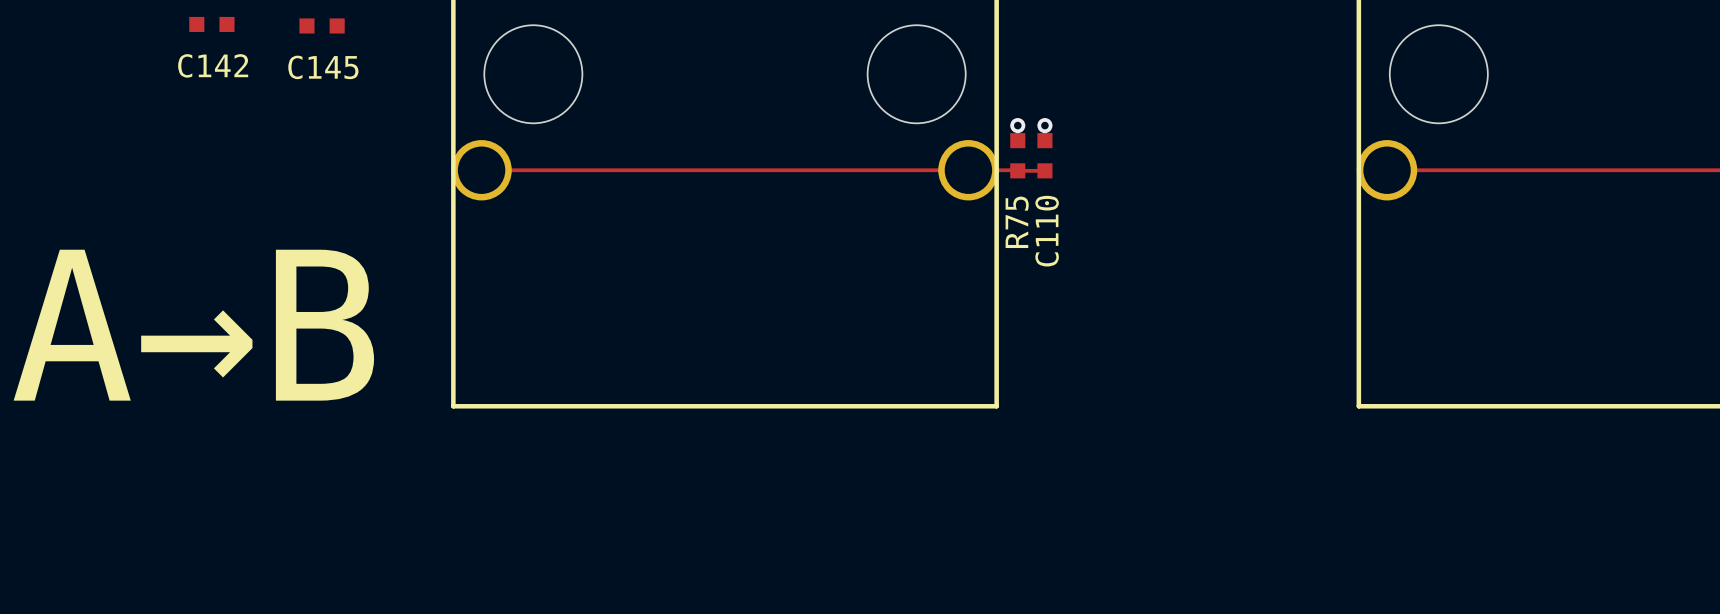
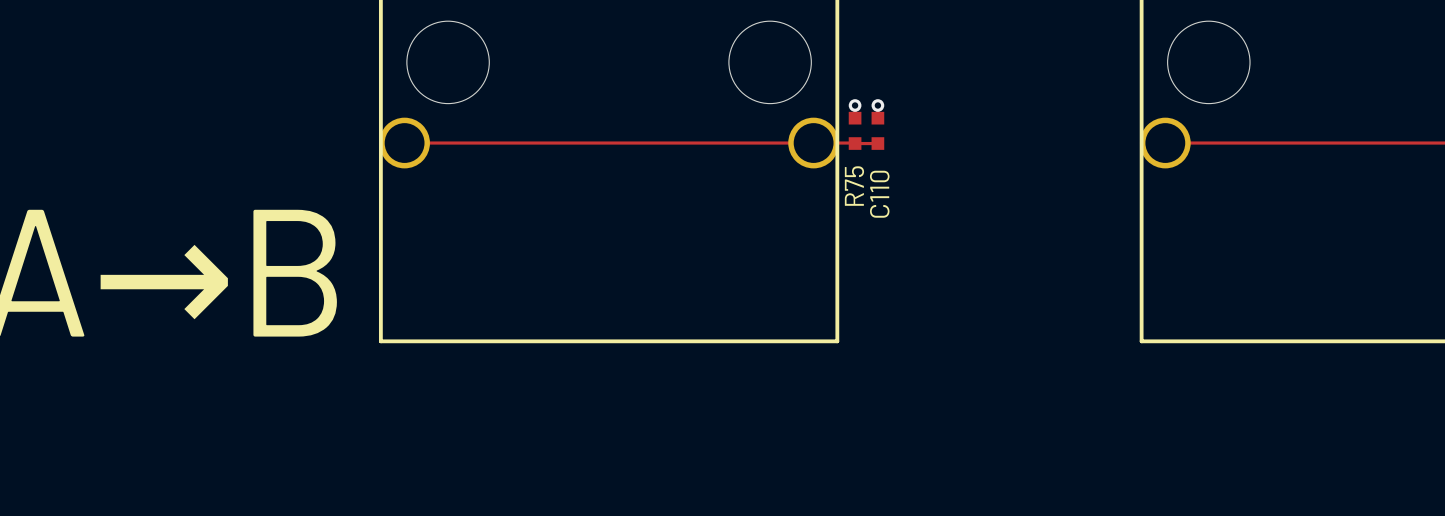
C142: (211, 24) -> none
C145: (322, 25) -> none

